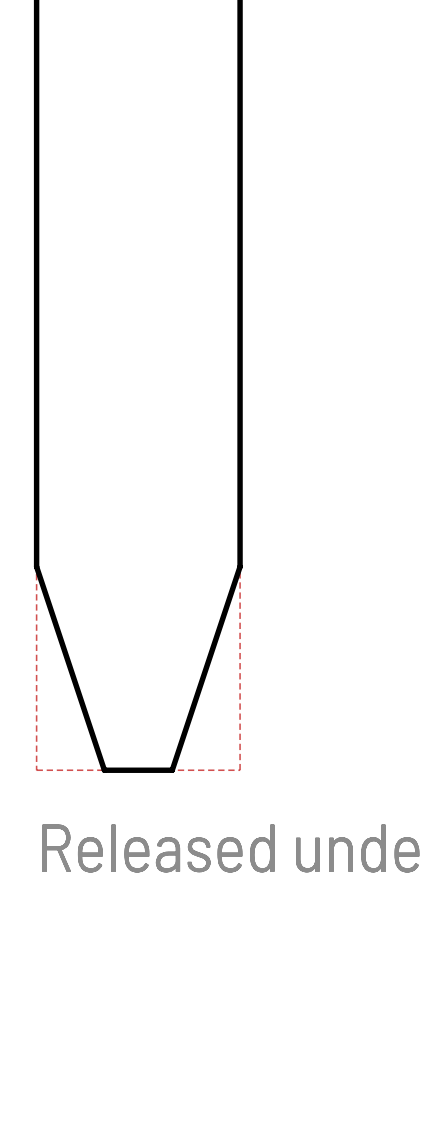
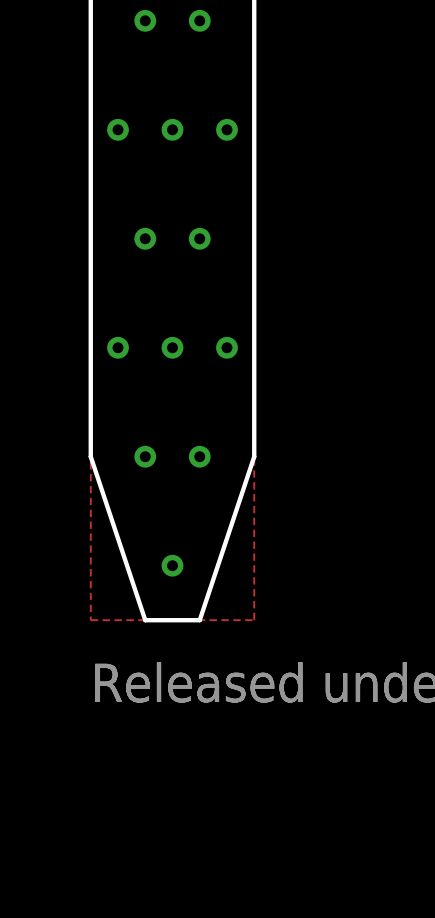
via: none -> (145, 20)
via: none -> (199, 20)
via: none -> (118, 129)
via: none -> (172, 129)
via: none -> (226, 129)
via: none -> (145, 238)
via: none -> (199, 238)
via: none -> (118, 347)
via: none -> (172, 347)
via: none -> (226, 347)
via: none -> (145, 456)
via: none -> (199, 456)
via: none -> (172, 565)

